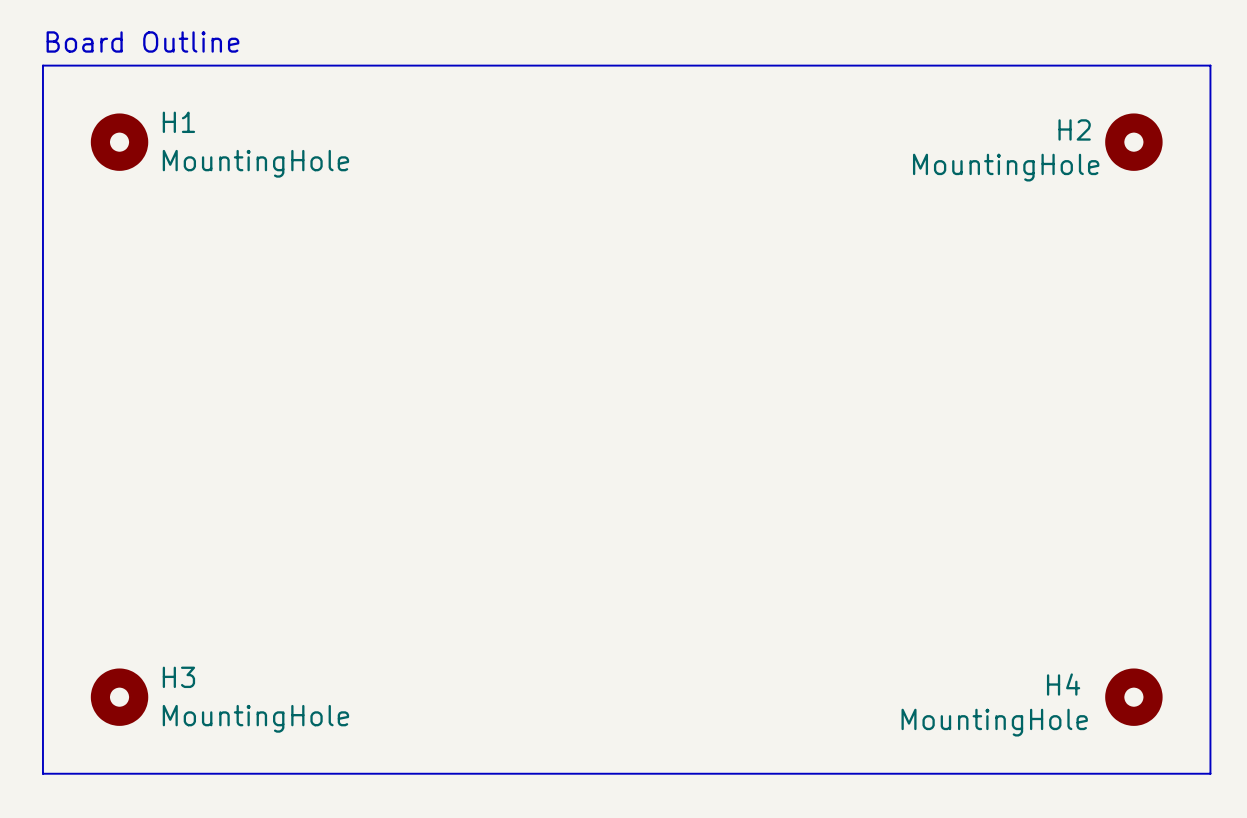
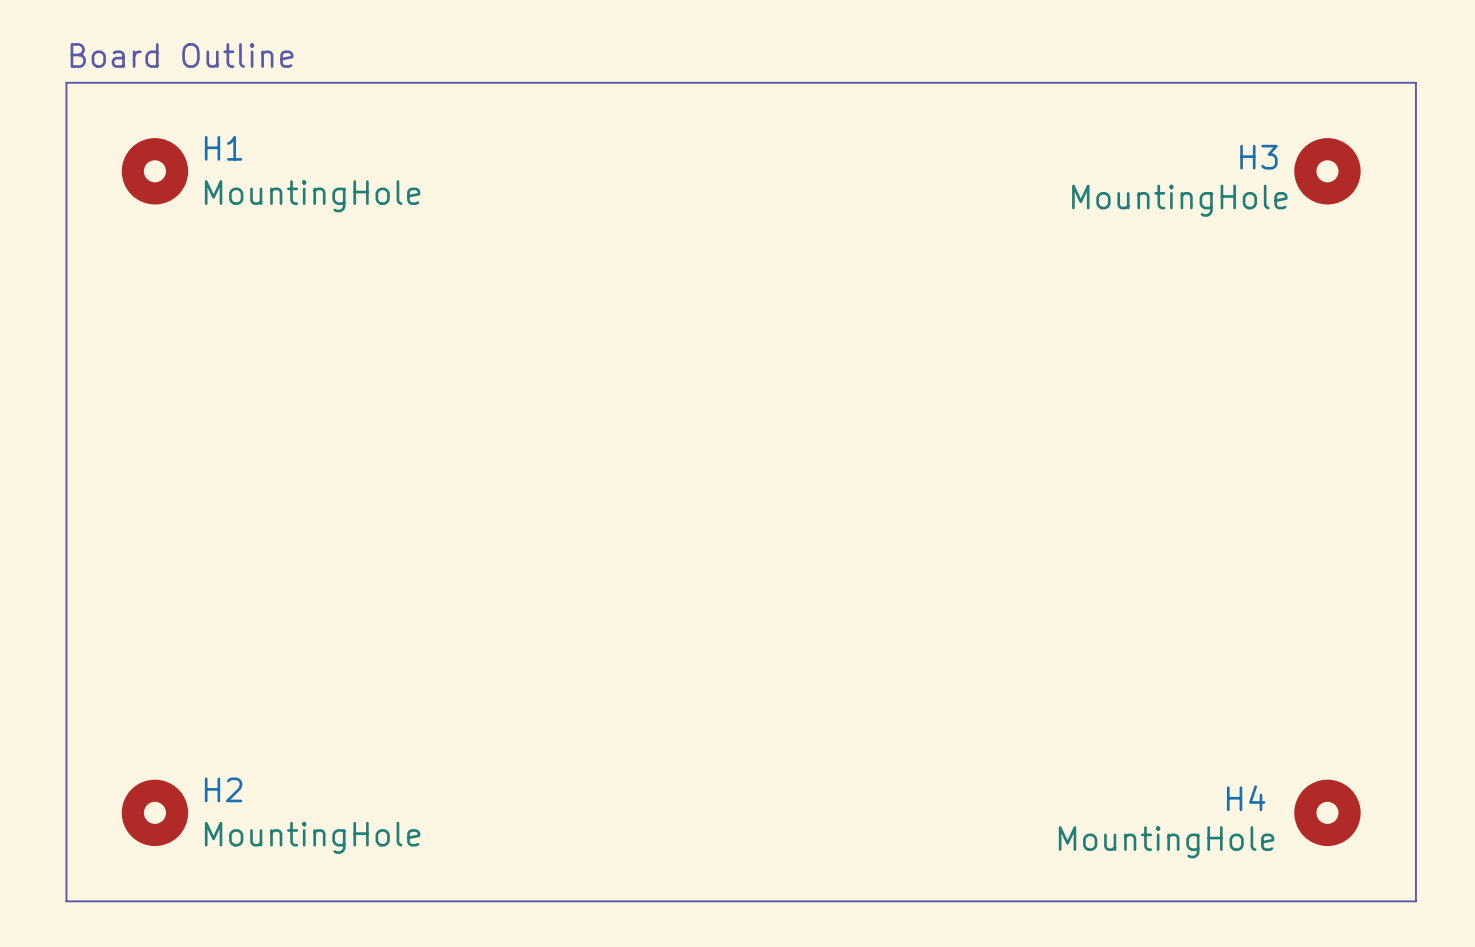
H2 name: H2 (1074, 129) -> H3 (1258, 157)
H3 name: H3 (178, 677) -> H2 (223, 789)

